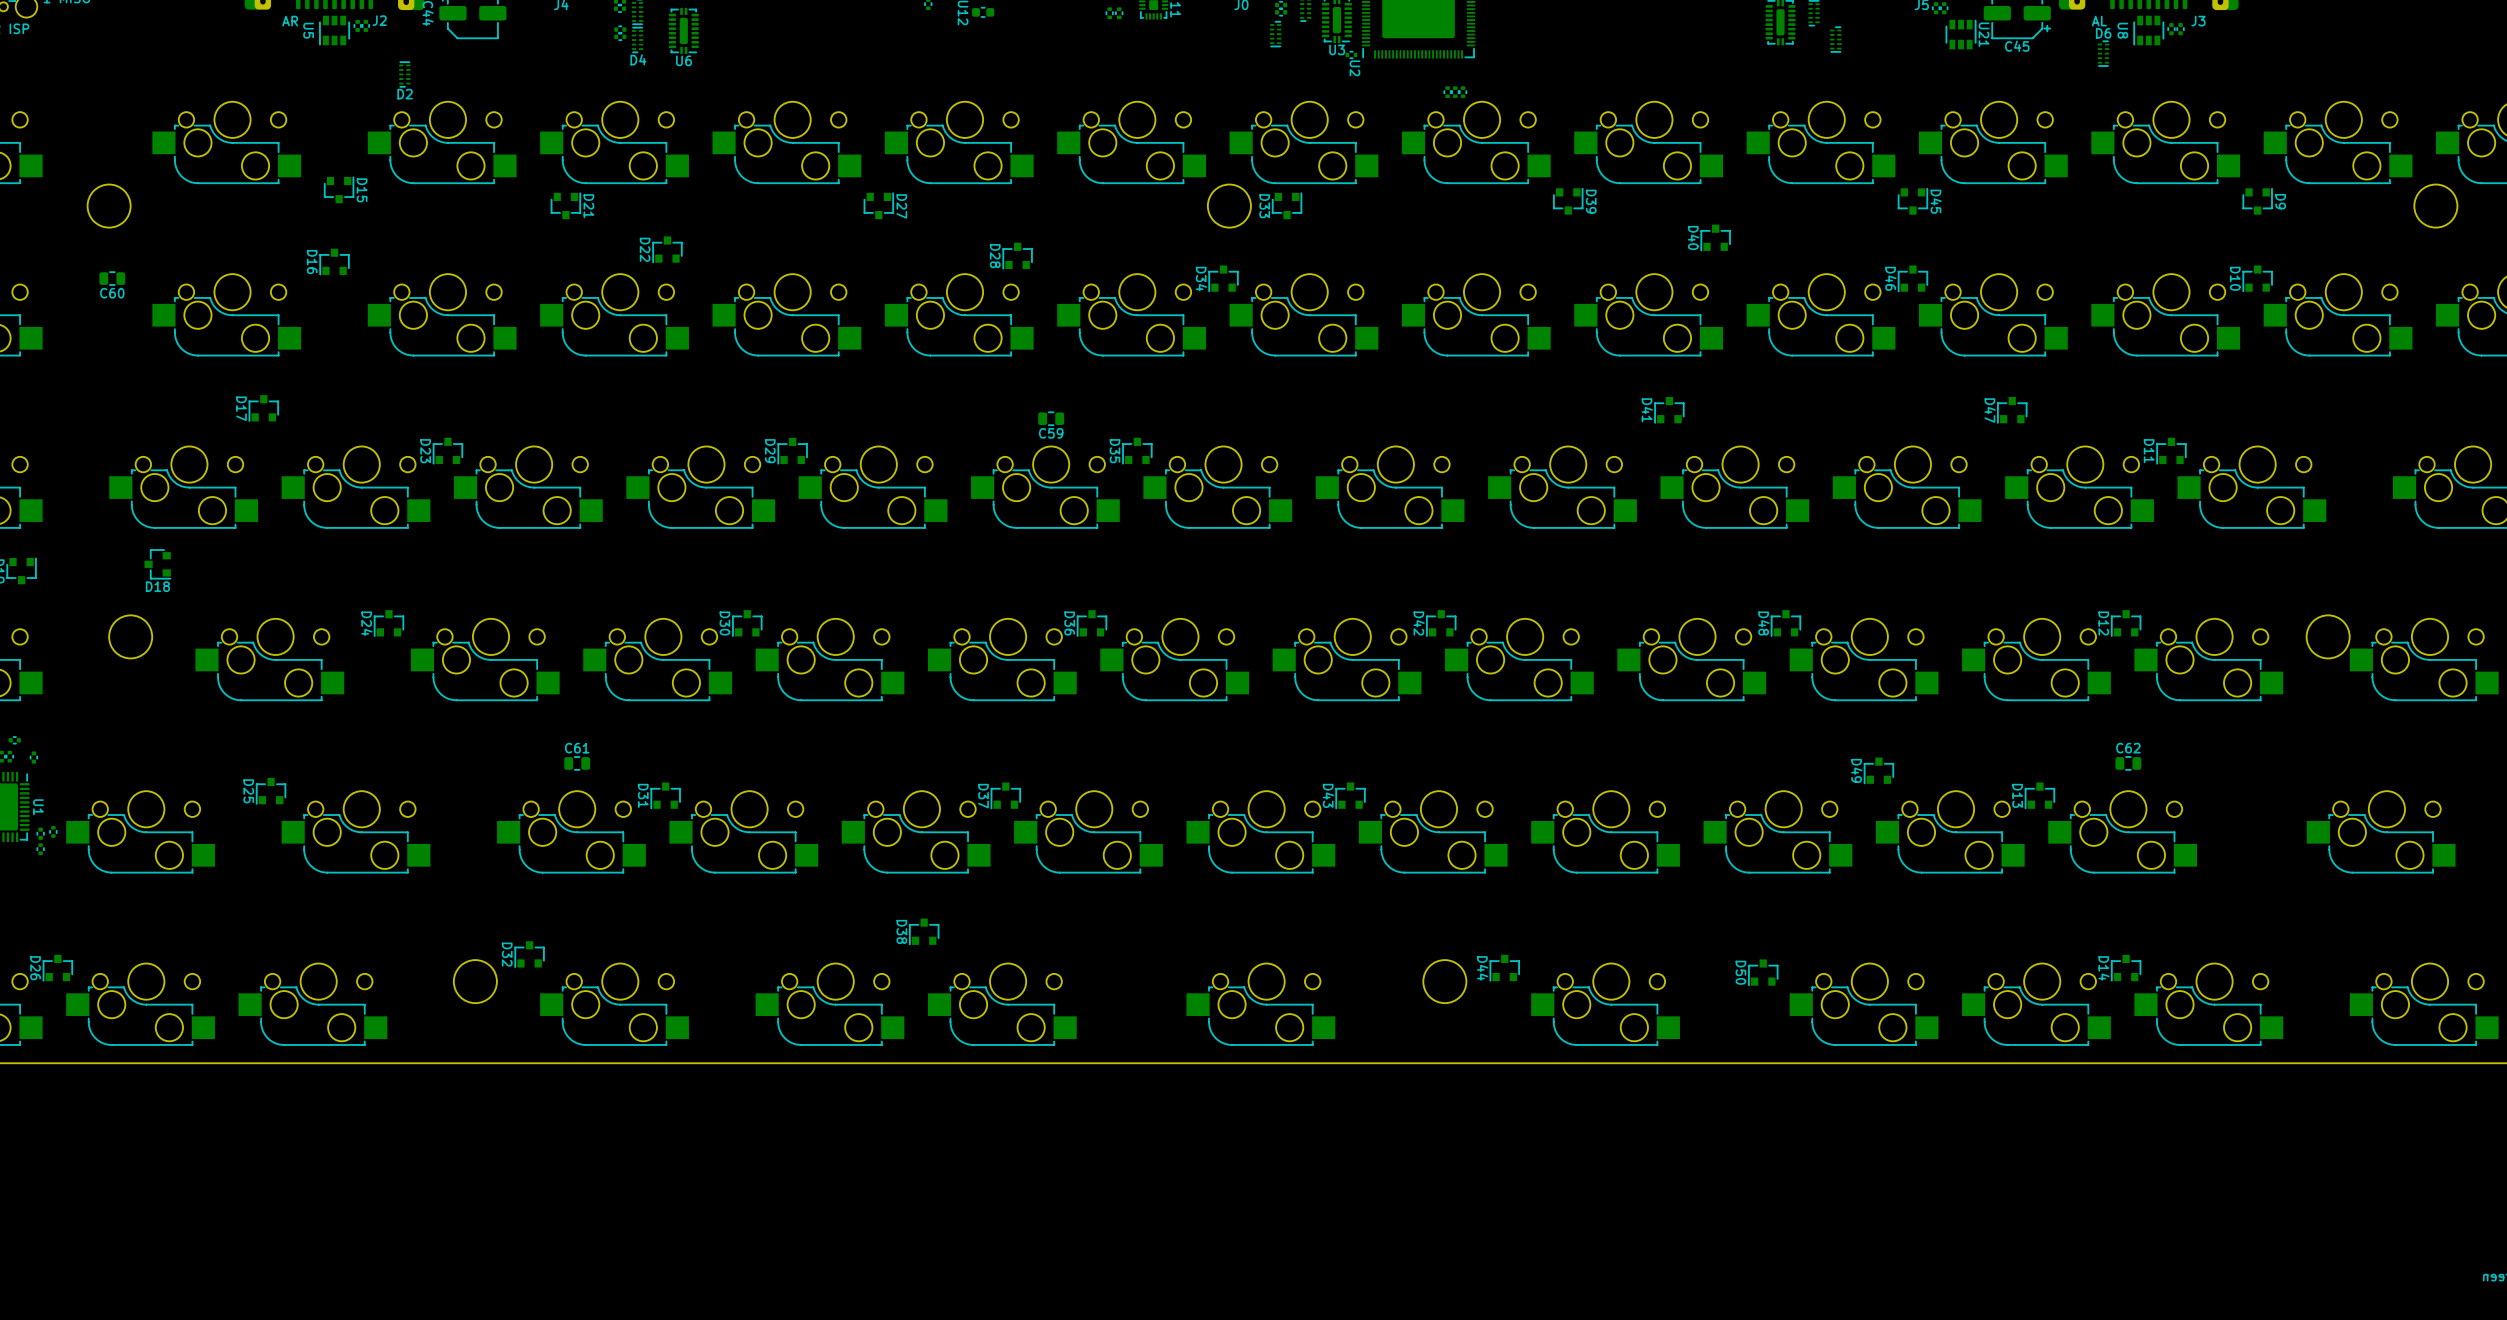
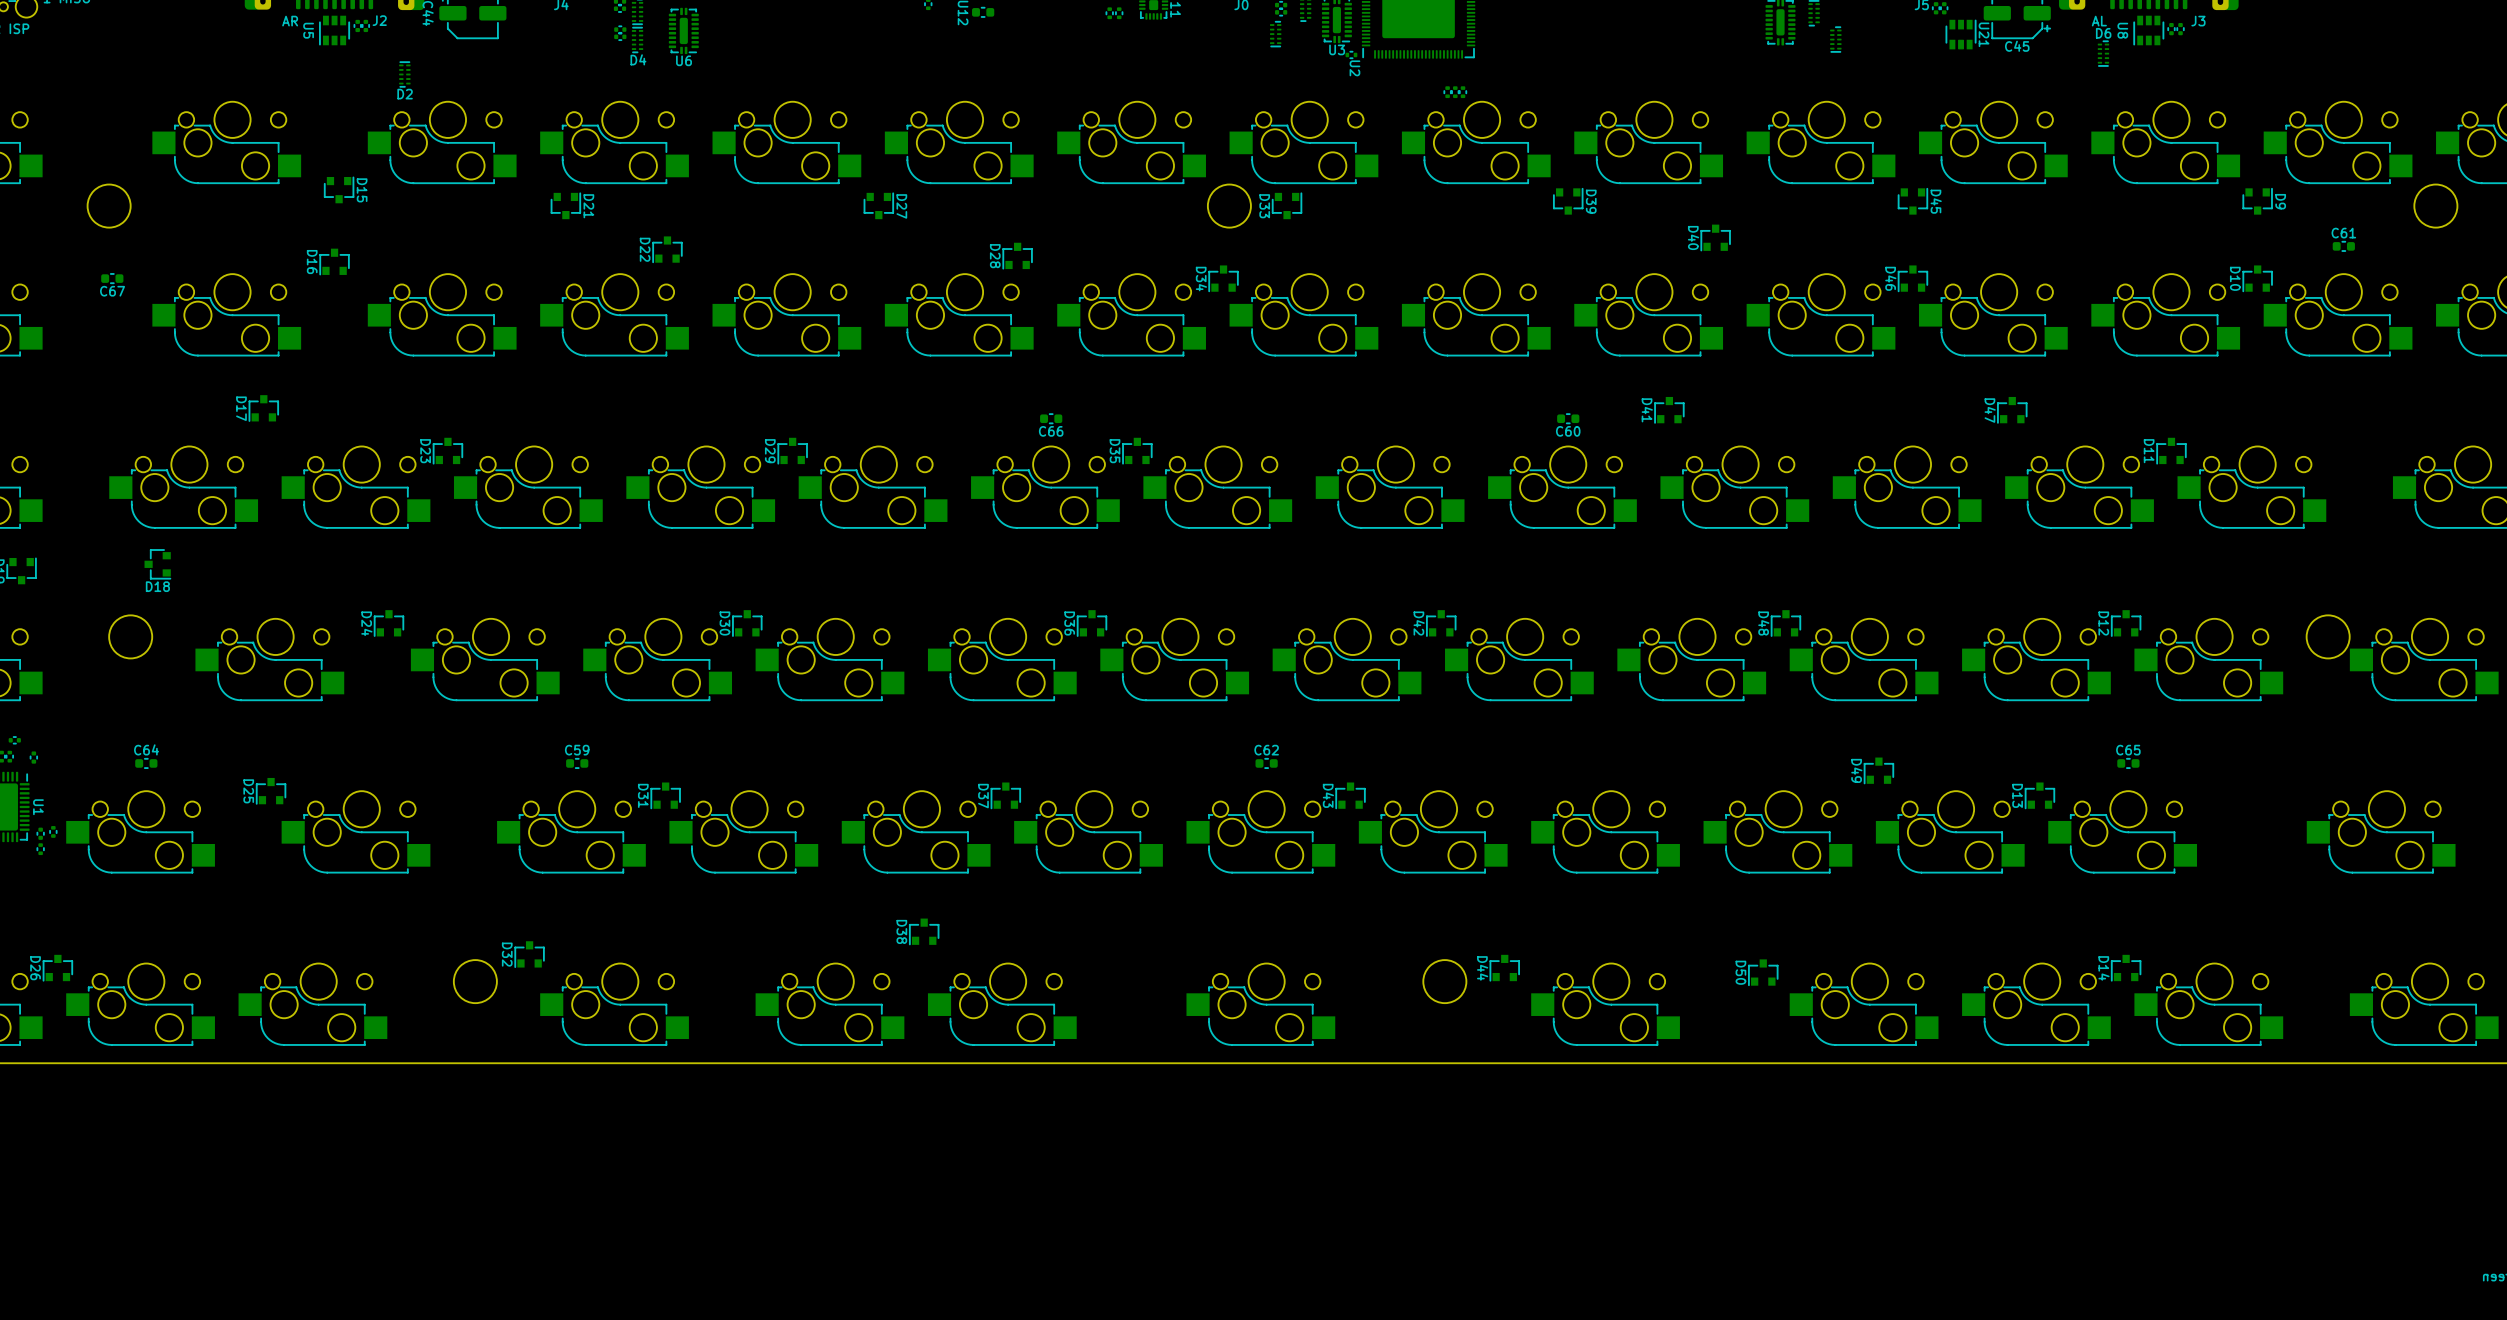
C60 footprint: [99, 271, 126, 286] -> [1557, 413, 1580, 424]
C67: none -> (112, 278)
C59 footprint: [1038, 411, 1065, 426] -> [566, 758, 589, 769]
C66: none -> (1051, 418)
C59 name position: C59 (1051, 433) -> C59 (577, 750)
C61 footprint: [564, 756, 591, 771] -> [2332, 241, 2355, 252]
C62 footprint: [2115, 756, 2142, 771] -> [1255, 758, 1278, 769]
C64: none -> (146, 763)
C65: none -> (2128, 763)

